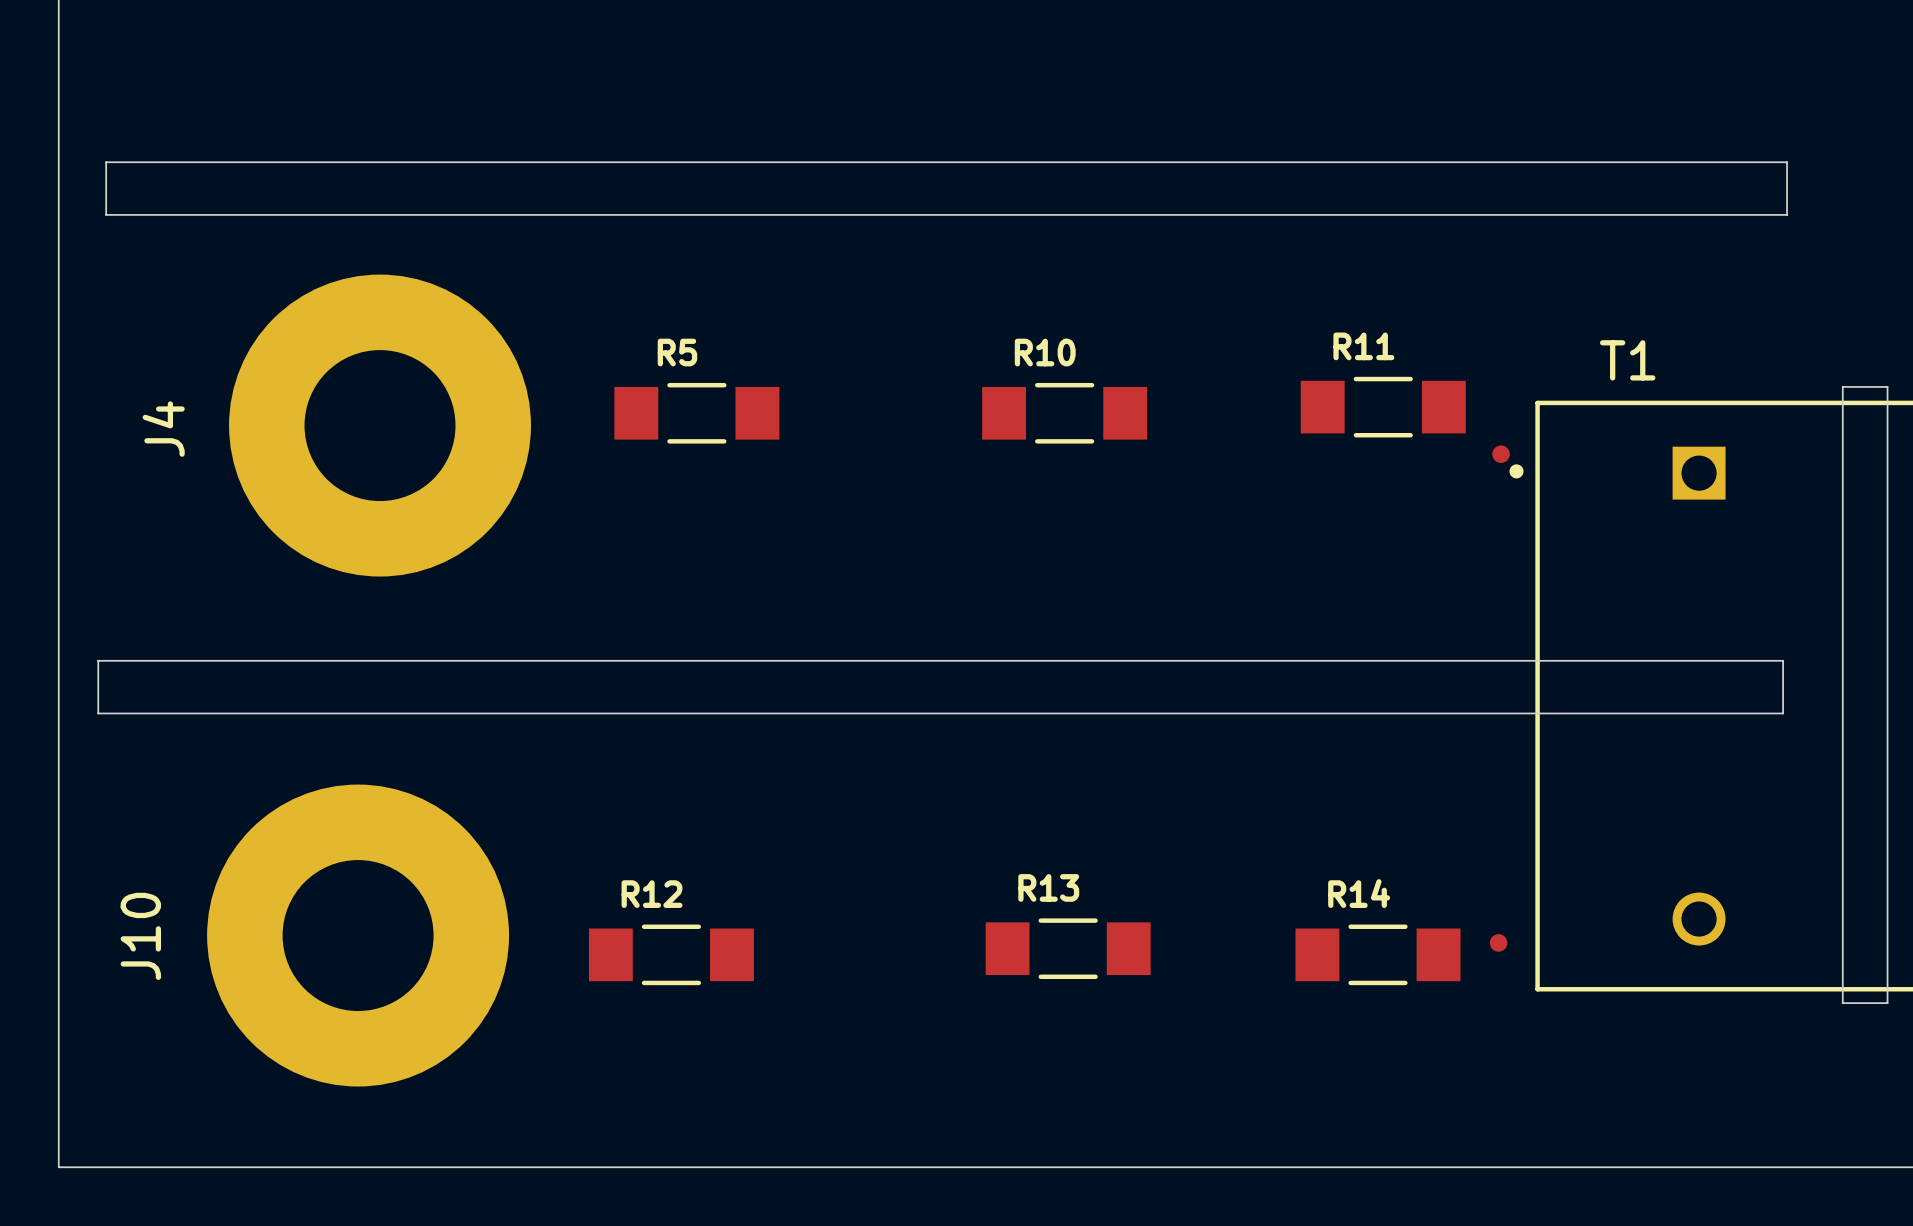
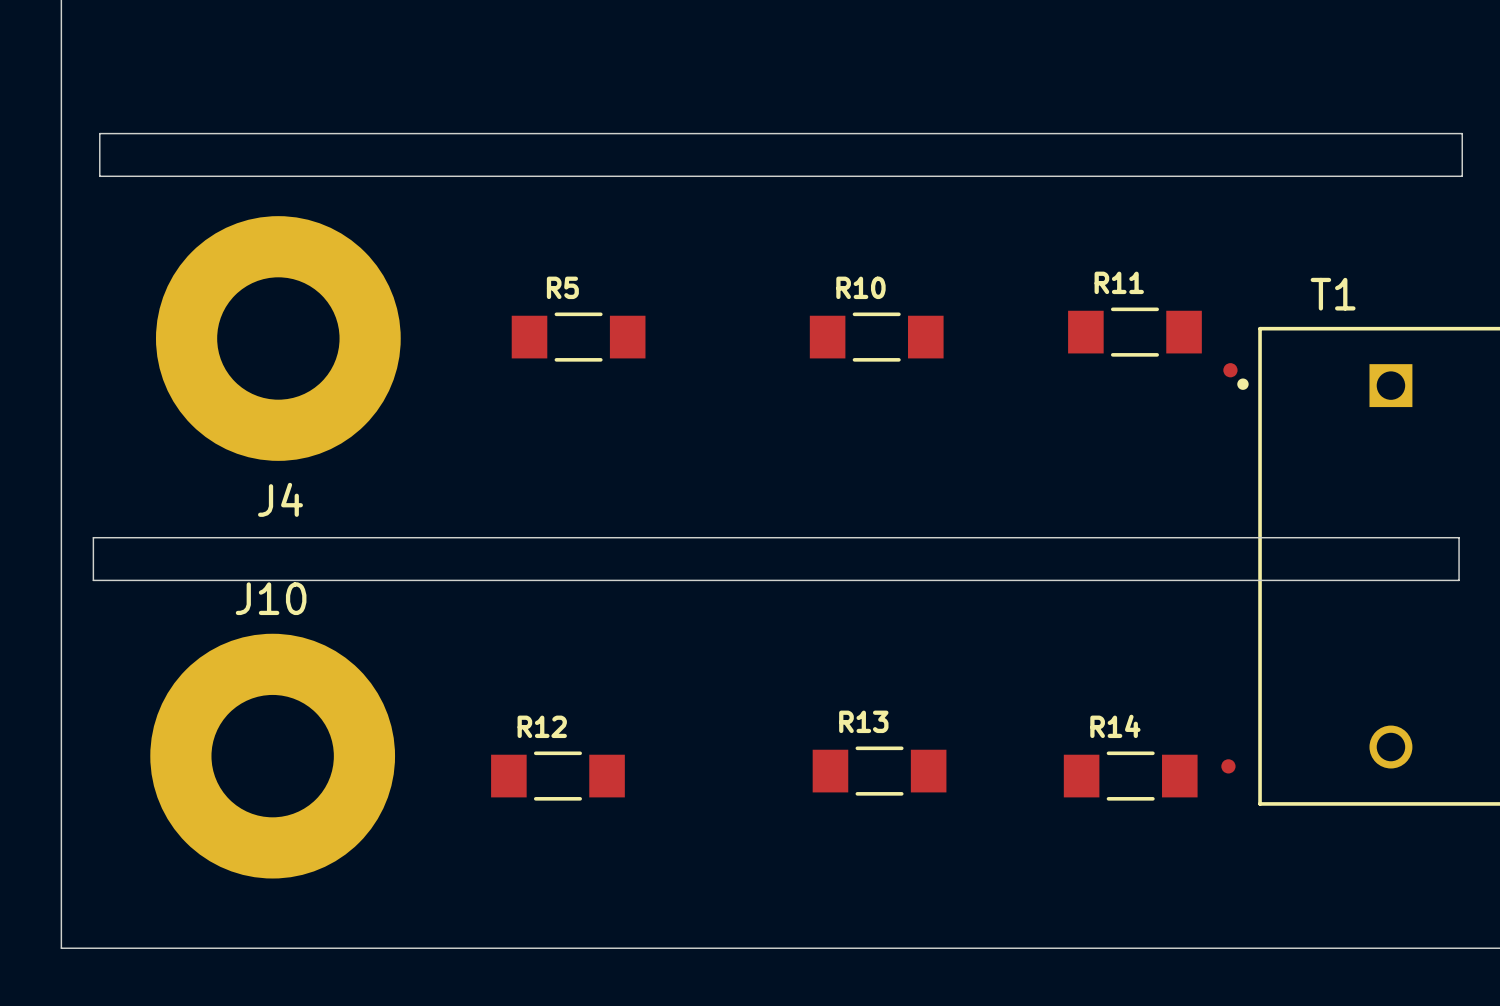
J4 position: (380, 425) -> (278, 338)
J4 name rotation: 0° (163, 429) -> 90° clockwise (280, 499)
J4 name position: J4 (163, 429) -> J4 (280, 499)
J10 position: (358, 935) -> (272, 756)
J10 name rotation: 0° (140, 936) -> 90° clockwise (271, 598)
J10 name position: J10 (140, 936) -> J10 (271, 598)

